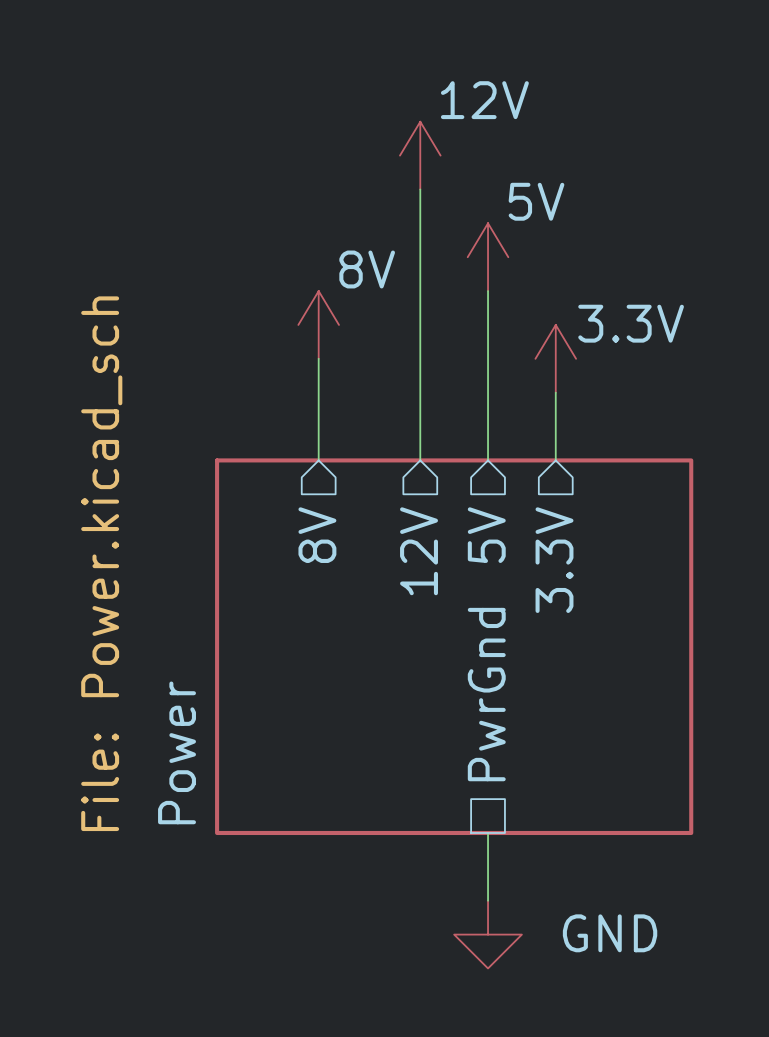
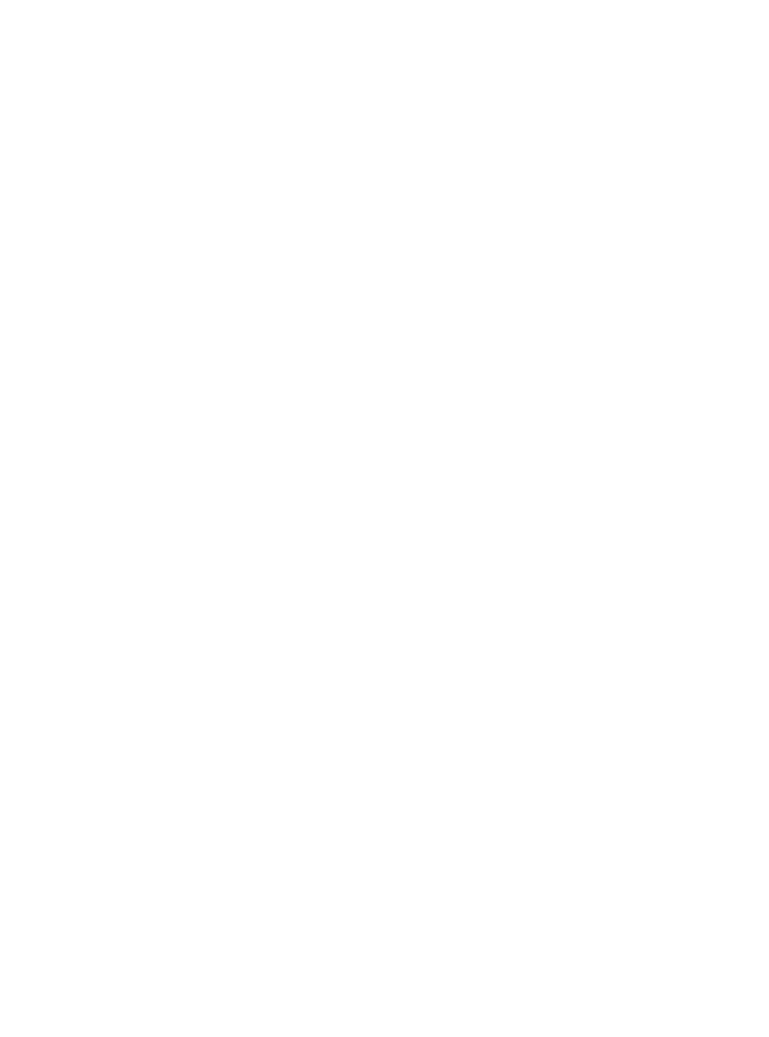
power symbol: 12V (420, 155) -> none
wire: (420, 189) (420, 460) -> none
power symbol: 5V (488, 257) -> none
wire: (488, 291) (488, 460) -> none
power symbol: 8V (318, 324) -> none
wire: (318, 358) (318, 460) -> none
power symbol: 3.3V (555, 358) -> none
wire: (555, 392) (555, 460) -> none
sheet pin: 8V (317, 535) -> none
sheet pin: 5V (486, 535) -> none
sheet pin: 12V (419, 551) -> none
sheet pin: 3.3V (554, 560) -> none
sheet Power: File: Power.kicad_sch (454, 646) -> none
sheet pin: PwrGnd (486, 694) -> none
wire: (488, 832) (488, 900) -> none
power symbol: GND (488, 934) -> none

